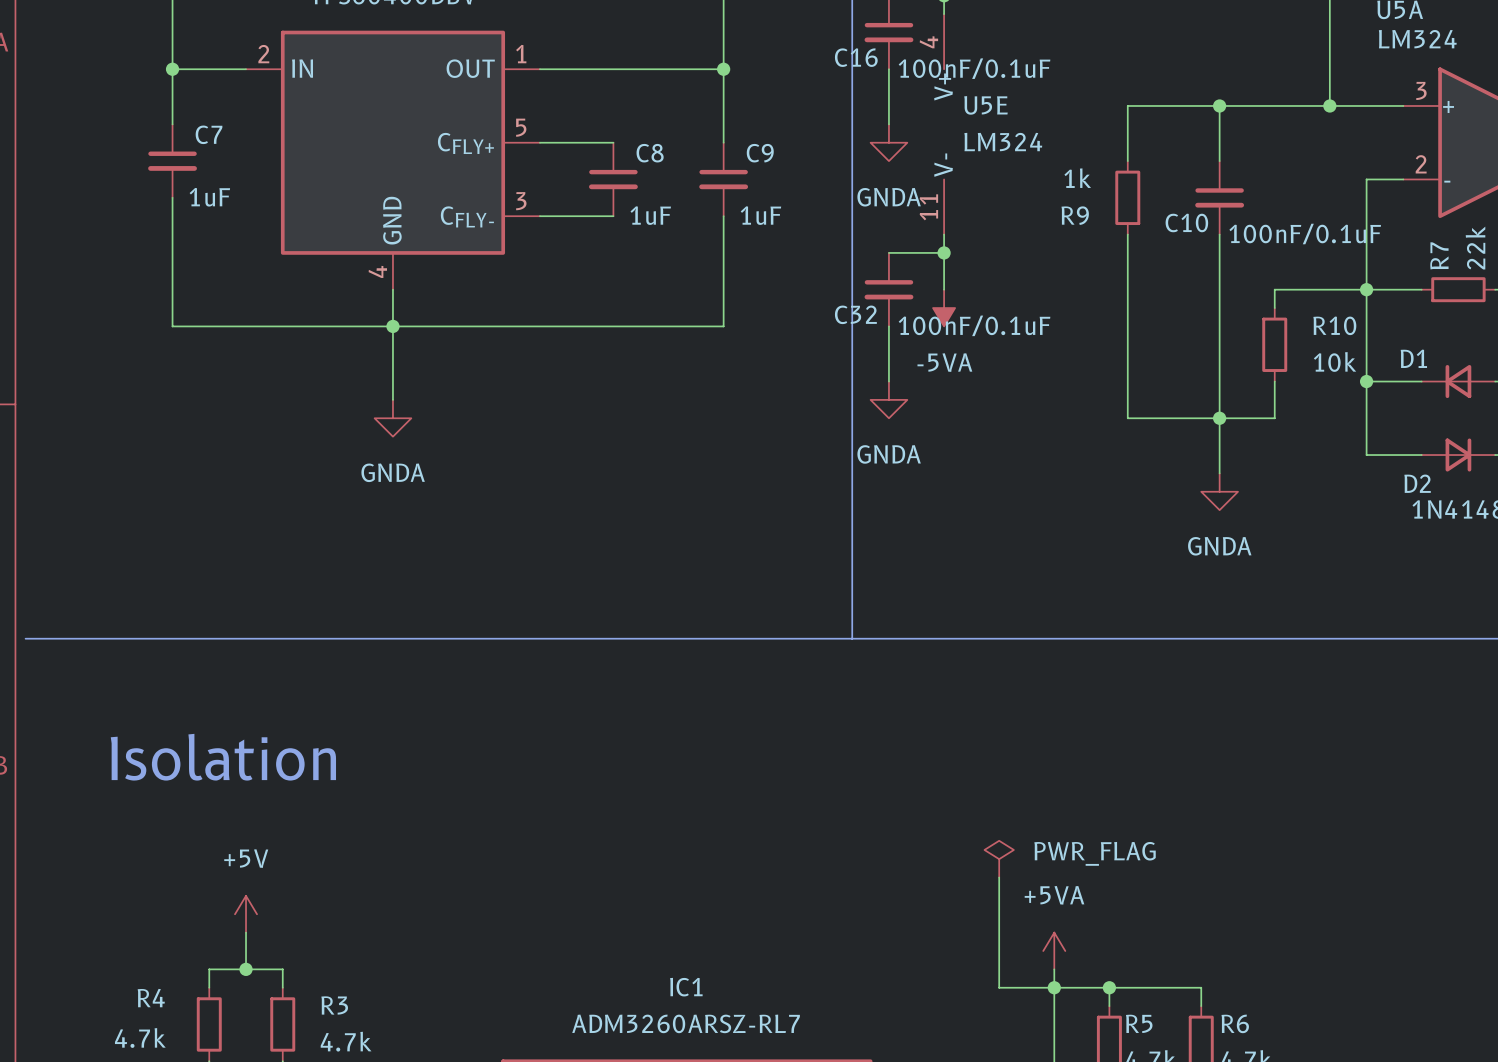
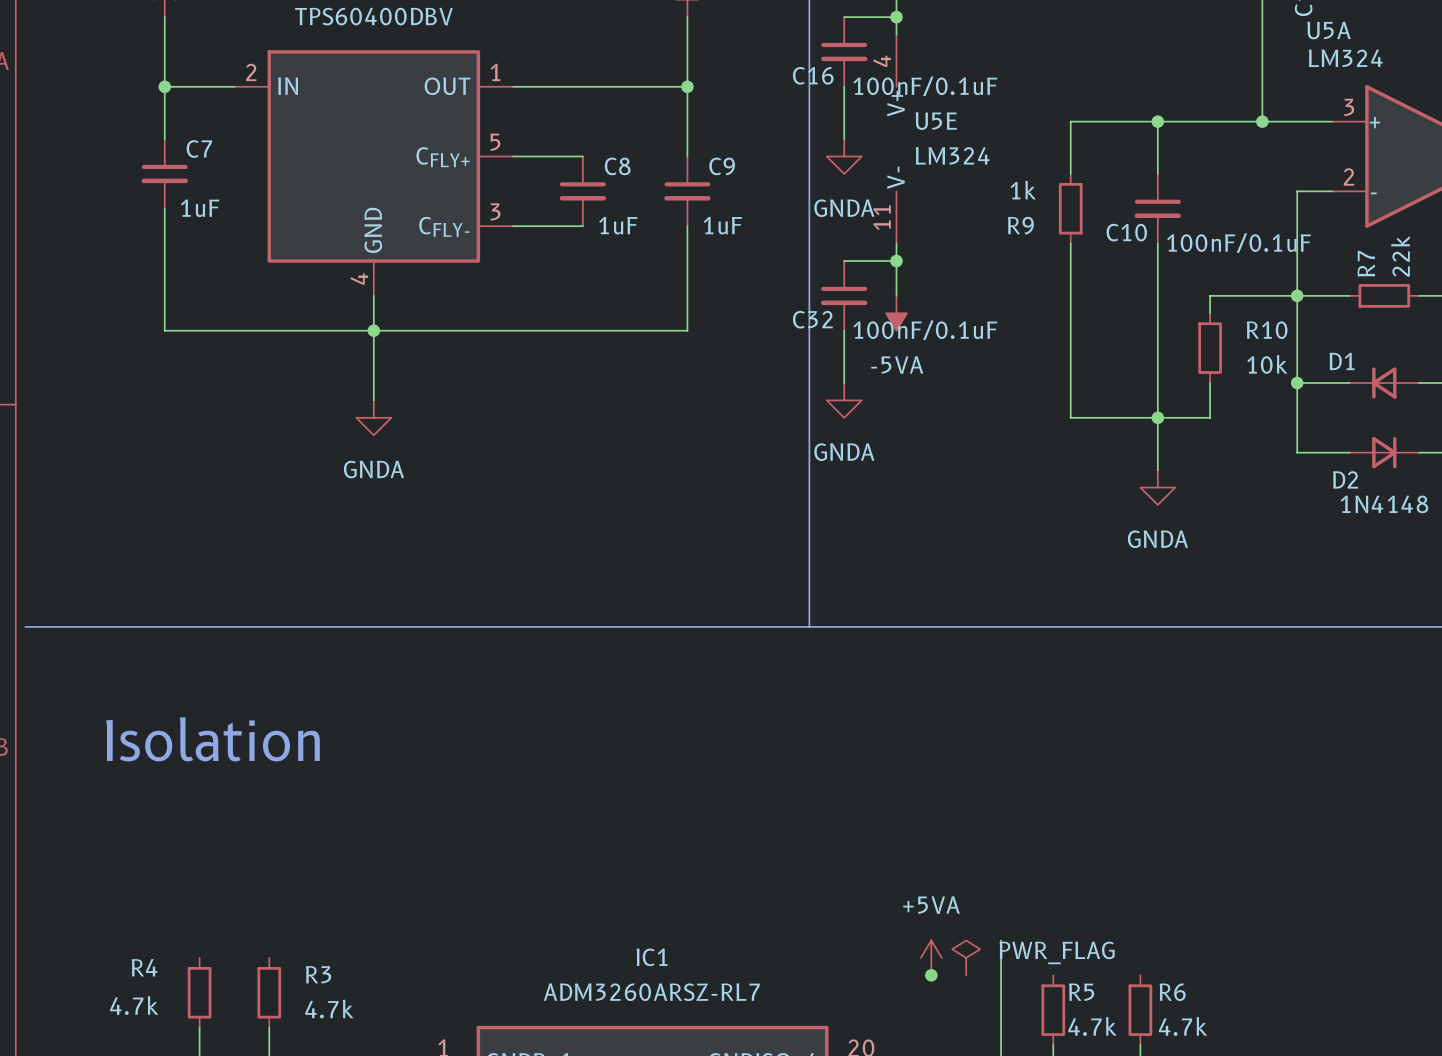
power symbol position: PWR_FLAG (999, 859) -> PWR_FLAG (966, 957)
wire: (999, 877) (999, 987) (1201, 987) (1201, 1006) -> none
power symbol: +5V (246, 914) -> none
wire: (246, 932) (246, 969) -> none
power symbol position: +5VA (1054, 951) -> +5VA (931, 957)
junction: (246, 969) -> none
wire: (209, 987) (209, 969) (282, 969) (282, 987) -> none
junction: (1054, 987) -> none
wire: (1109, 987) (1109, 1006) -> none
junction: (1109, 987) -> none
junction: none -> (931, 975)

